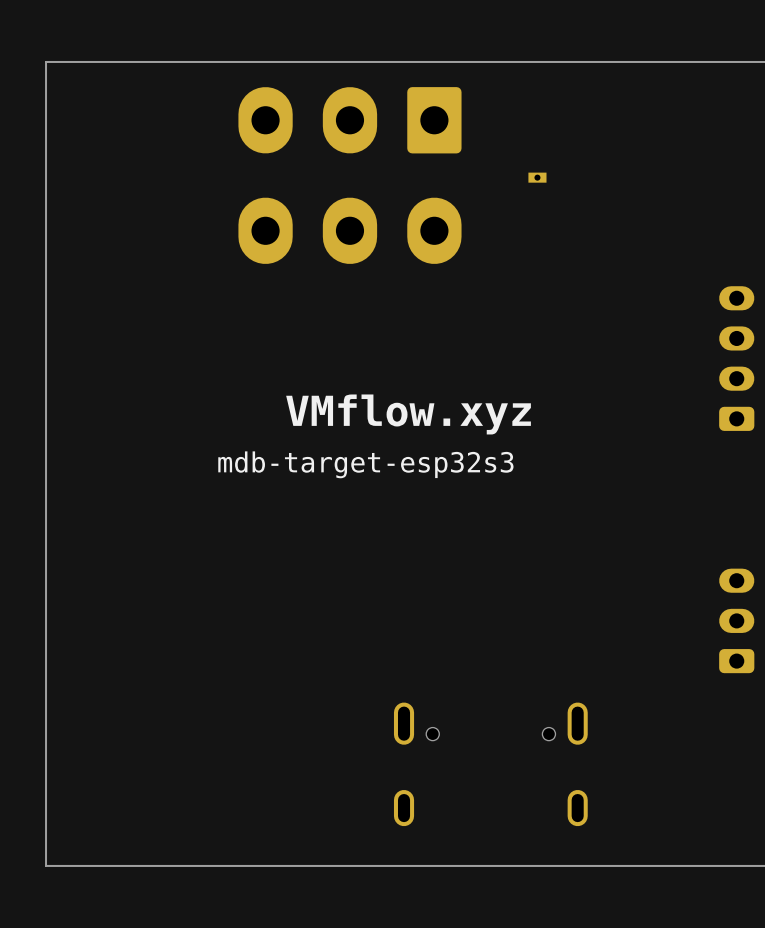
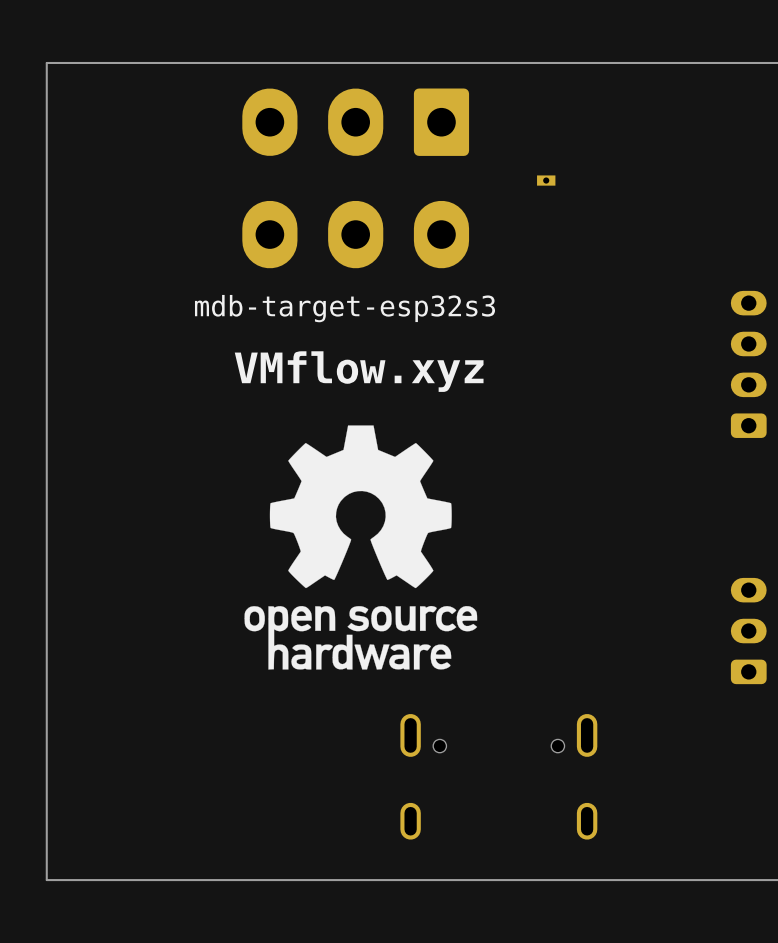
text position: VMflow.xyz (408, 414) -> VMflow.xyz (359, 371)
drawing: none -> [244, 425, 478, 670]
text position: mdb-target-esp32s3 (365, 464) -> mdb-target-esp32s3 (345, 308)

